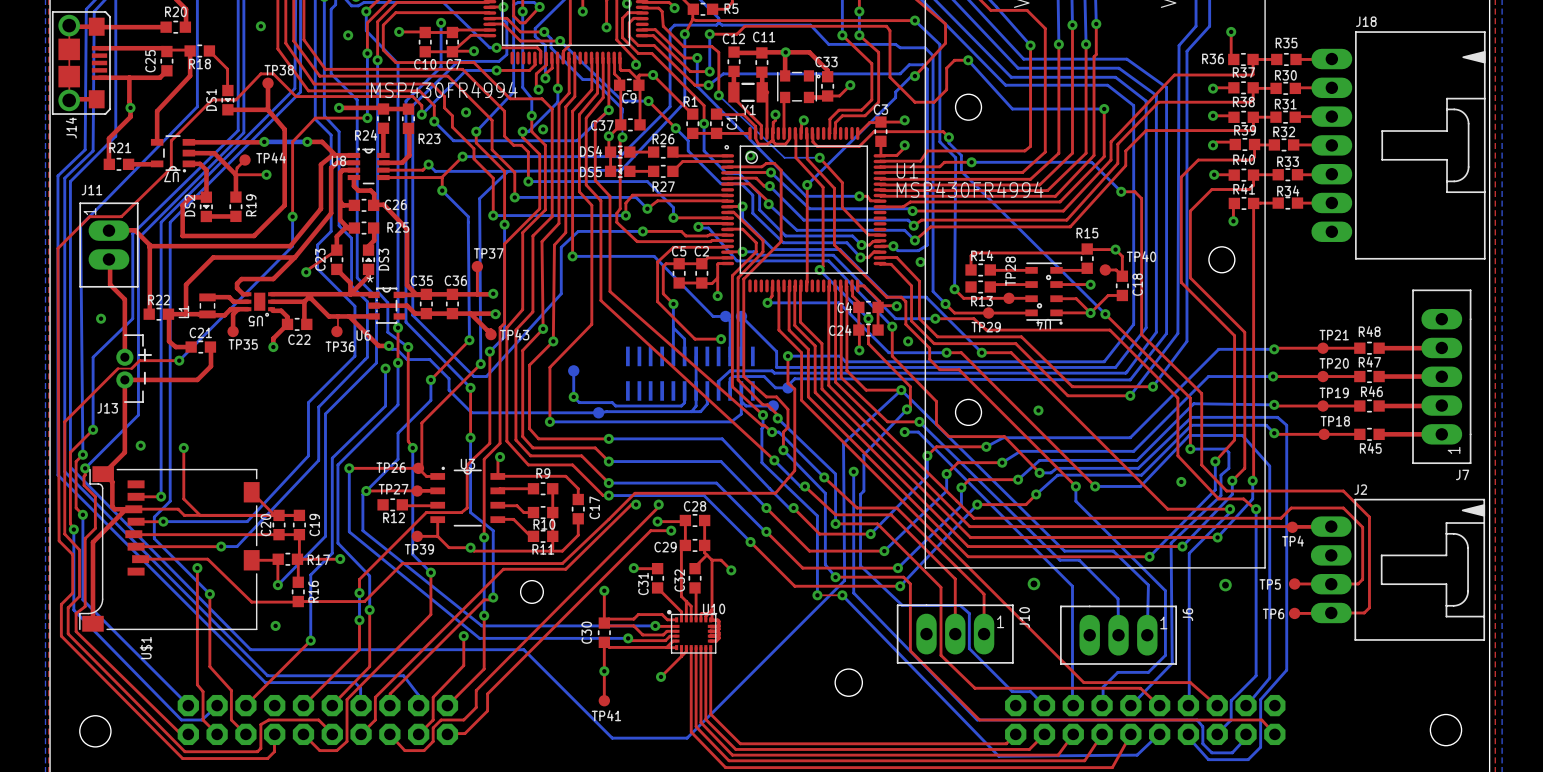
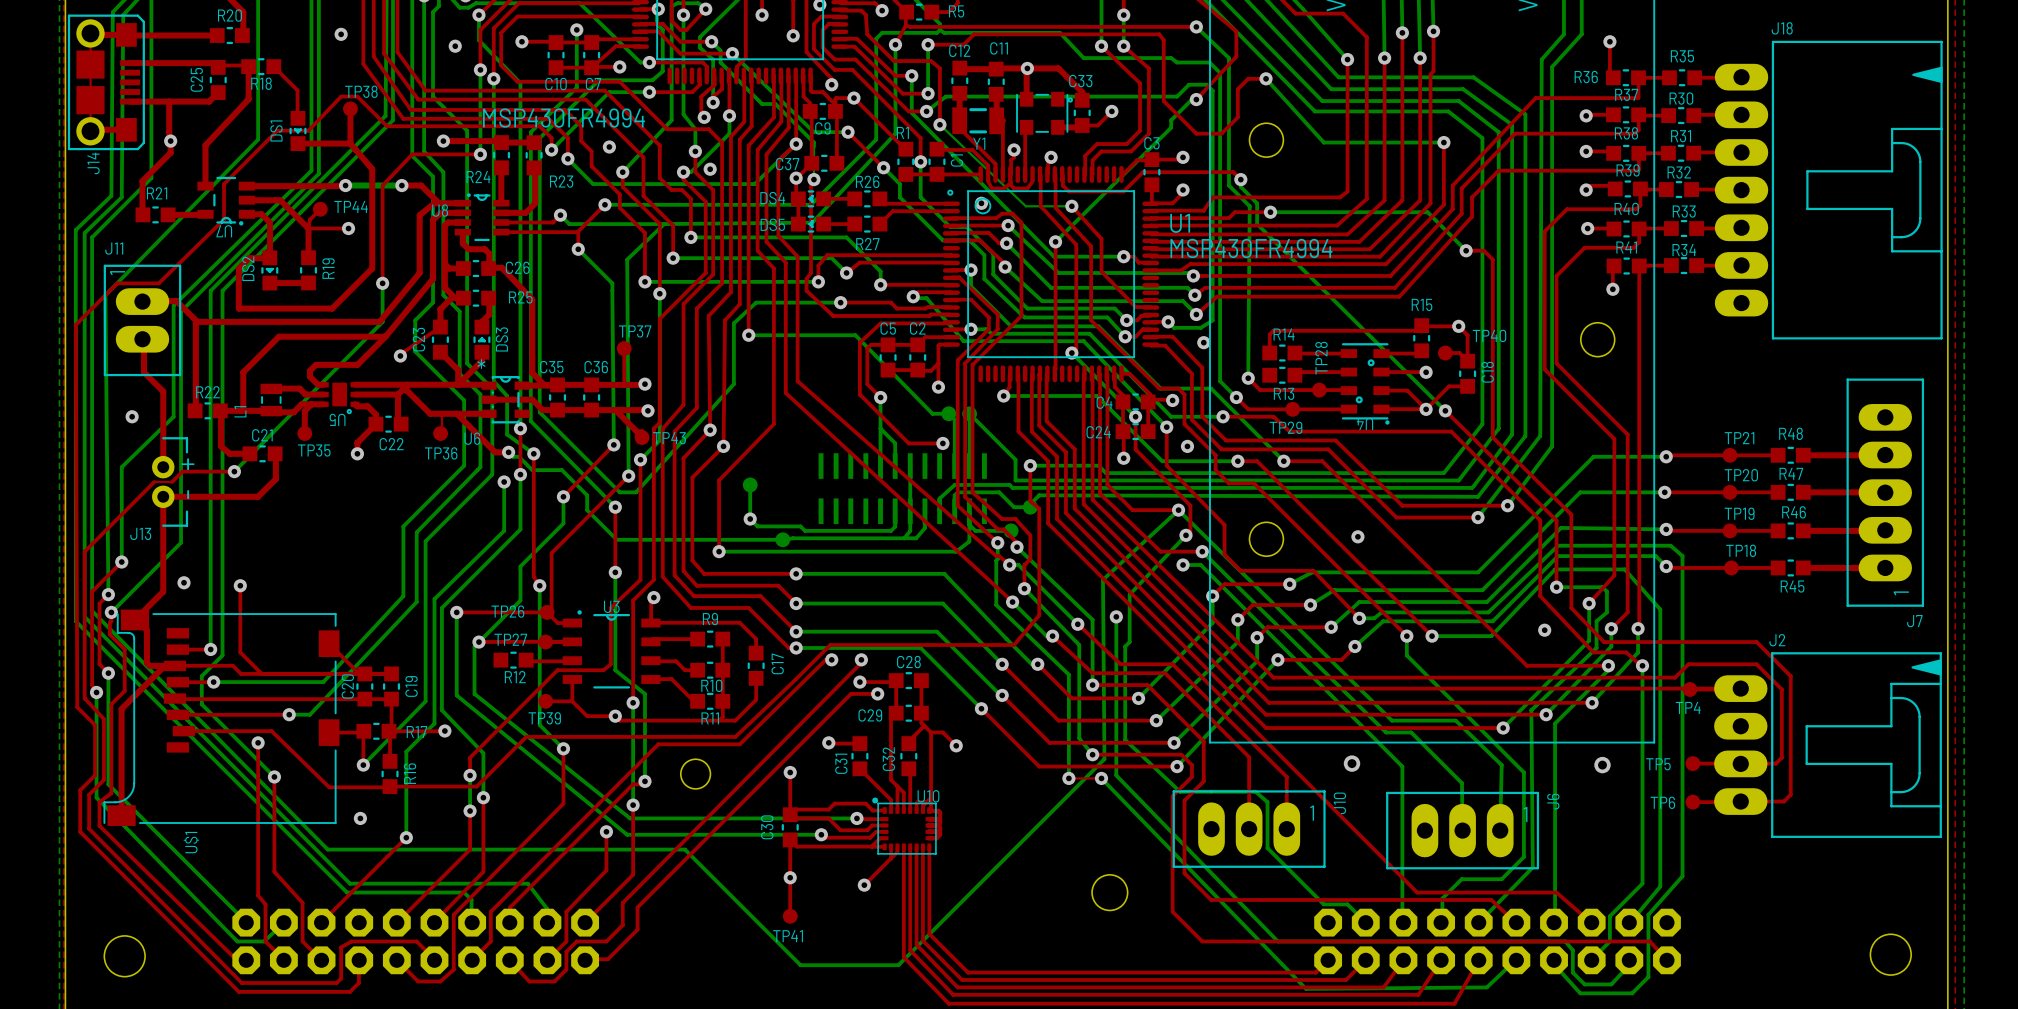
top track: (920, 566) (941, 587) (941, 655) (975, 688) -> (1203, 741) (1203, 781) (1184, 800) (1184, 873) (1211, 899) (1274, 899)
top track: (910, 583) (910, 650) (979, 719) -> (1190, 763) (1191, 776) (1172, 796) (1172, 911) (1202, 941) (1280, 941)

